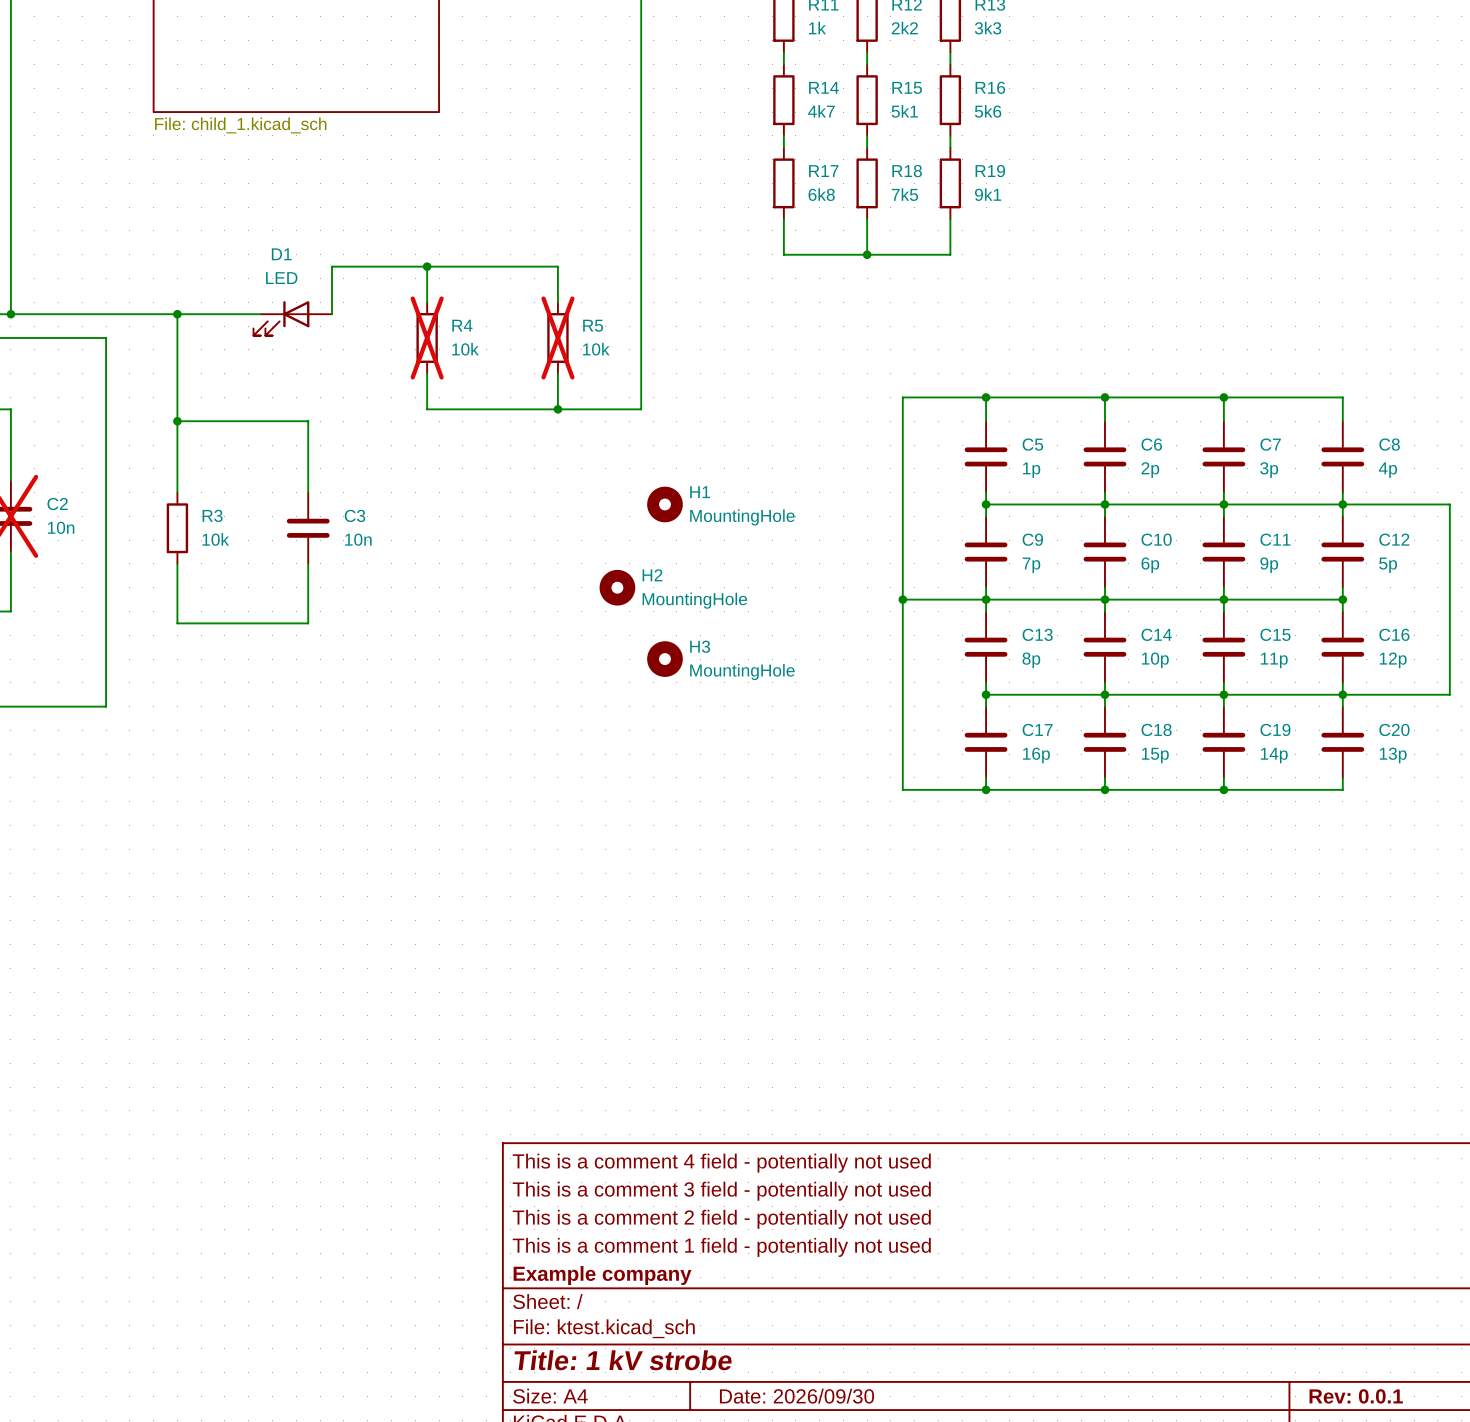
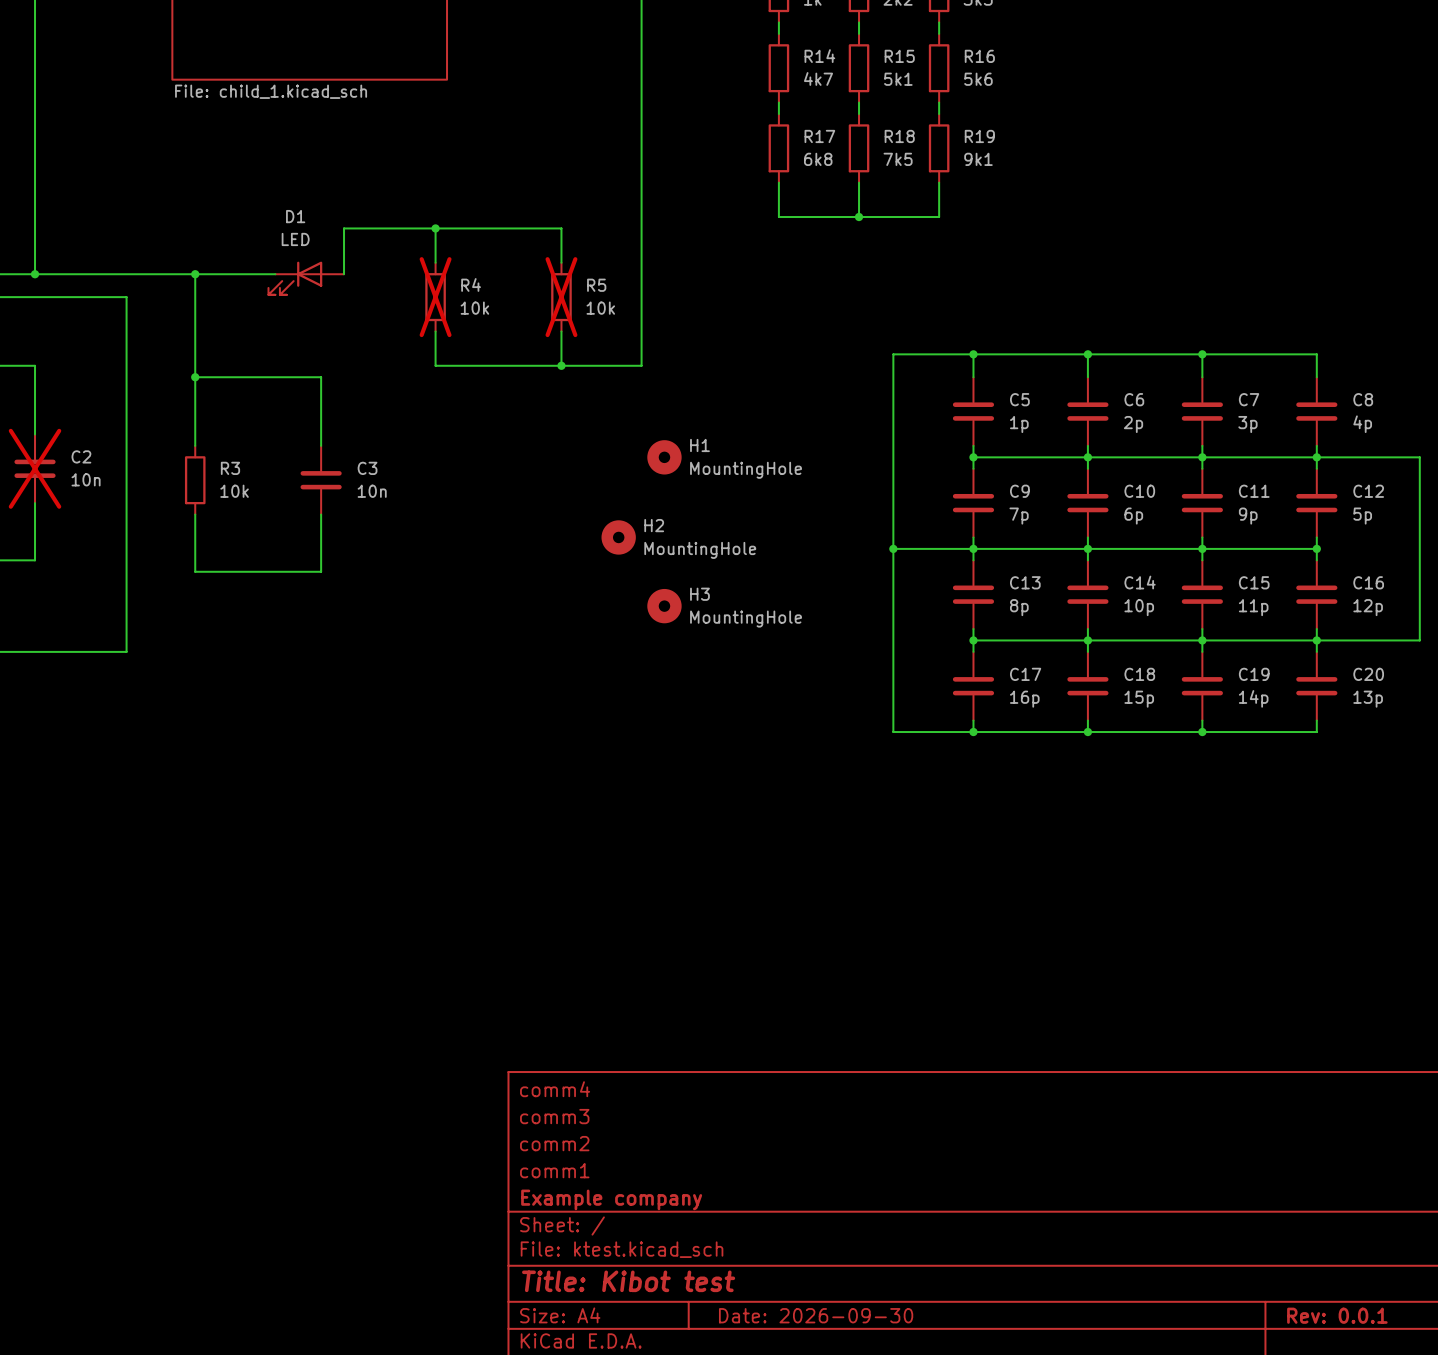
title block: This is a comment 4 field - potentially not used (721, 1163) -> comm4 (555, 1089)
title block: This is a comment 3 field - potentially not used (721, 1191) -> comm3 (554, 1116)
title block: This is a comment 2 field - potentially not used (721, 1219) -> comm2 (554, 1143)
title block: This is a comment 1 field - potentially not used (721, 1247) -> comm1 (554, 1170)
title block: Title: 1 kV strobe (623, 1360) -> Title: Kibot test (628, 1281)
title block: Date: 2026/09/30 (797, 1396) -> Date: 2026-09-30 (816, 1315)

